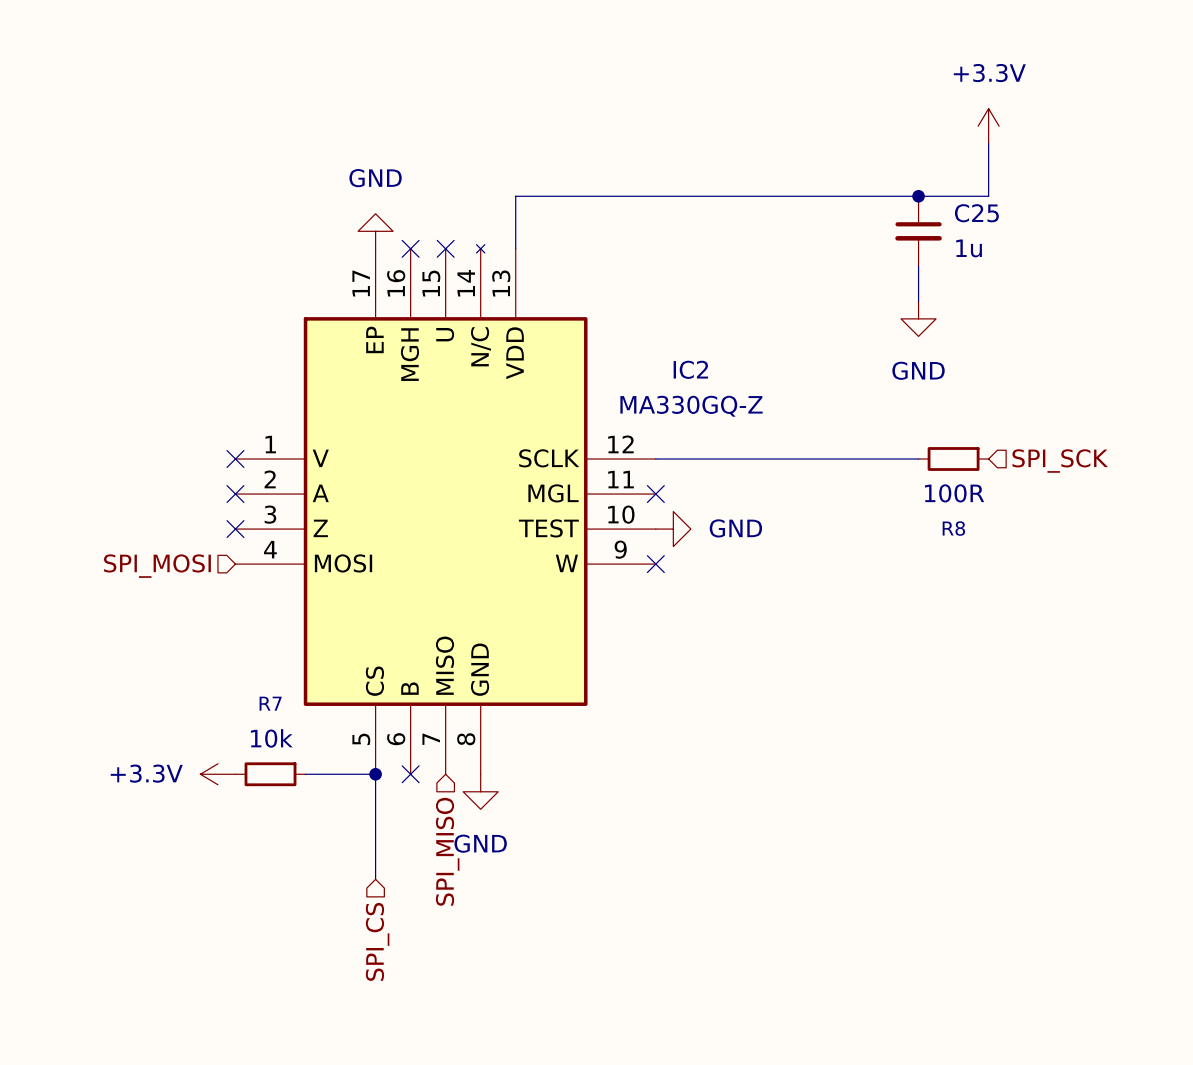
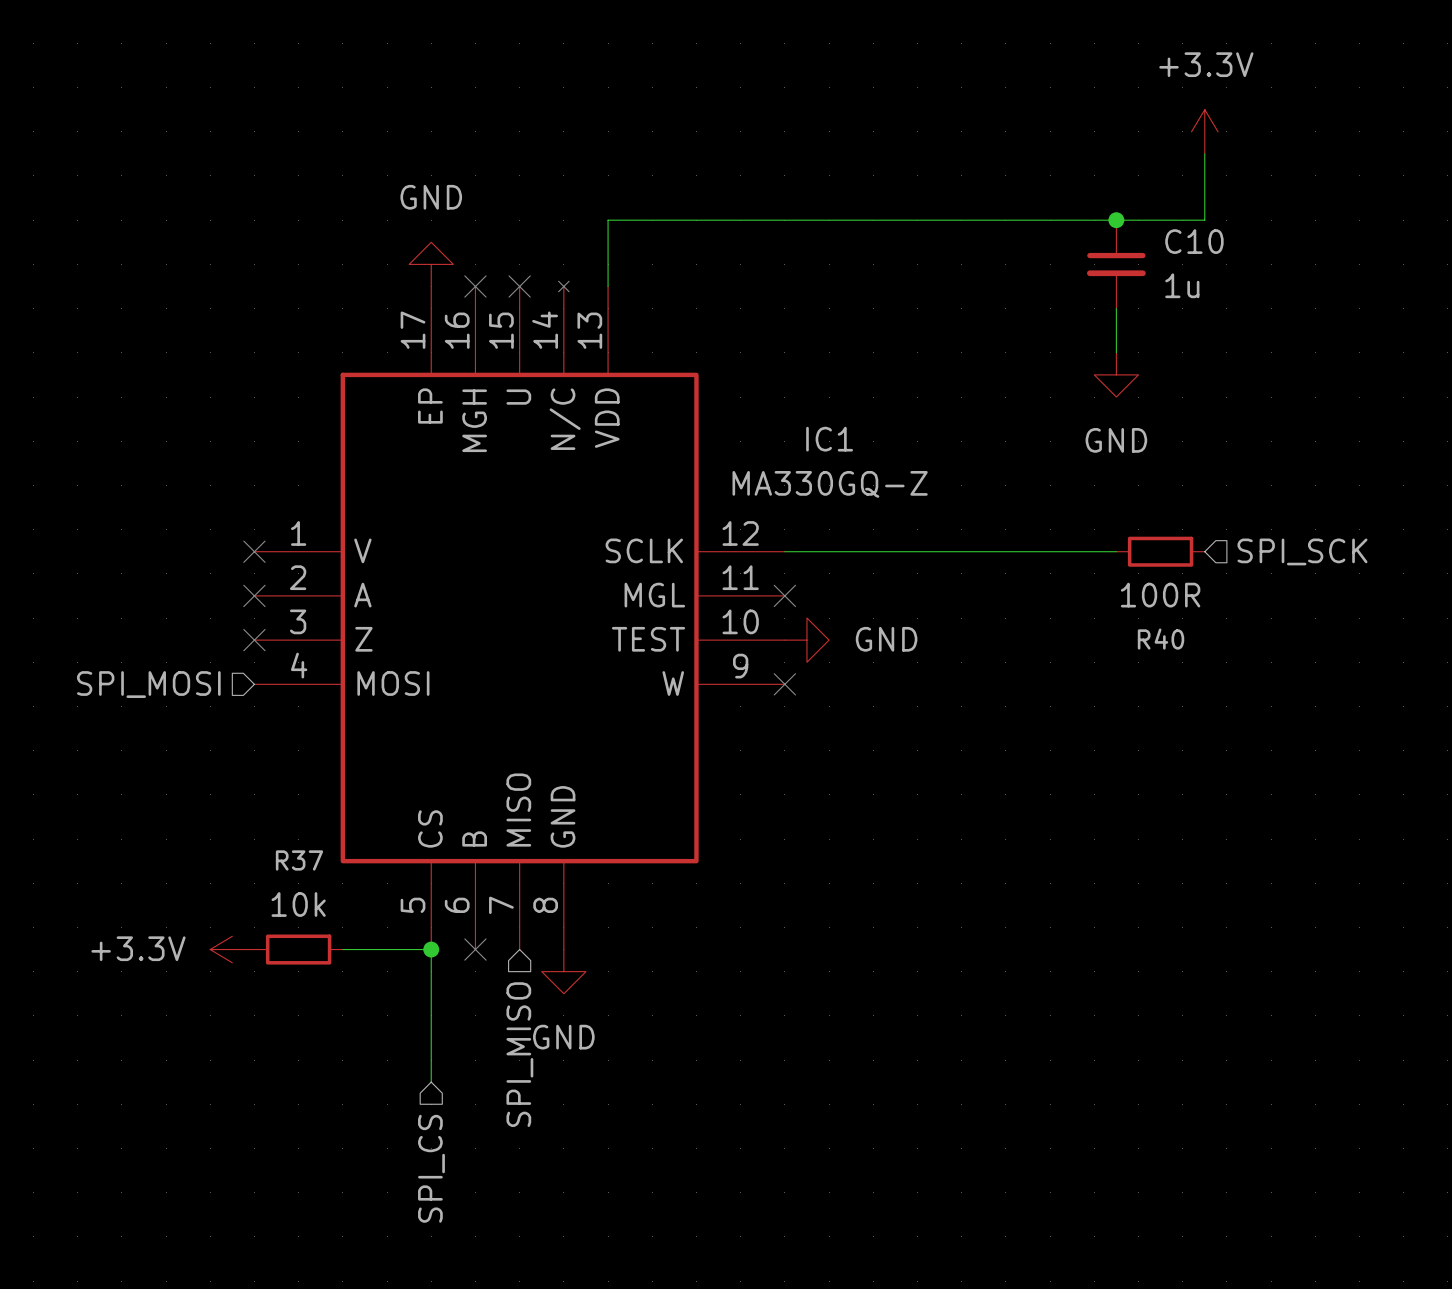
C25 name: C25 (976, 213) -> C10 (1194, 241)
IC2 name: IC2 (690, 369) -> IC1 (829, 439)
R8 name: R8 (953, 528) -> R40 (1161, 639)
R7 name: R7 (270, 703) -> R37 (299, 860)

